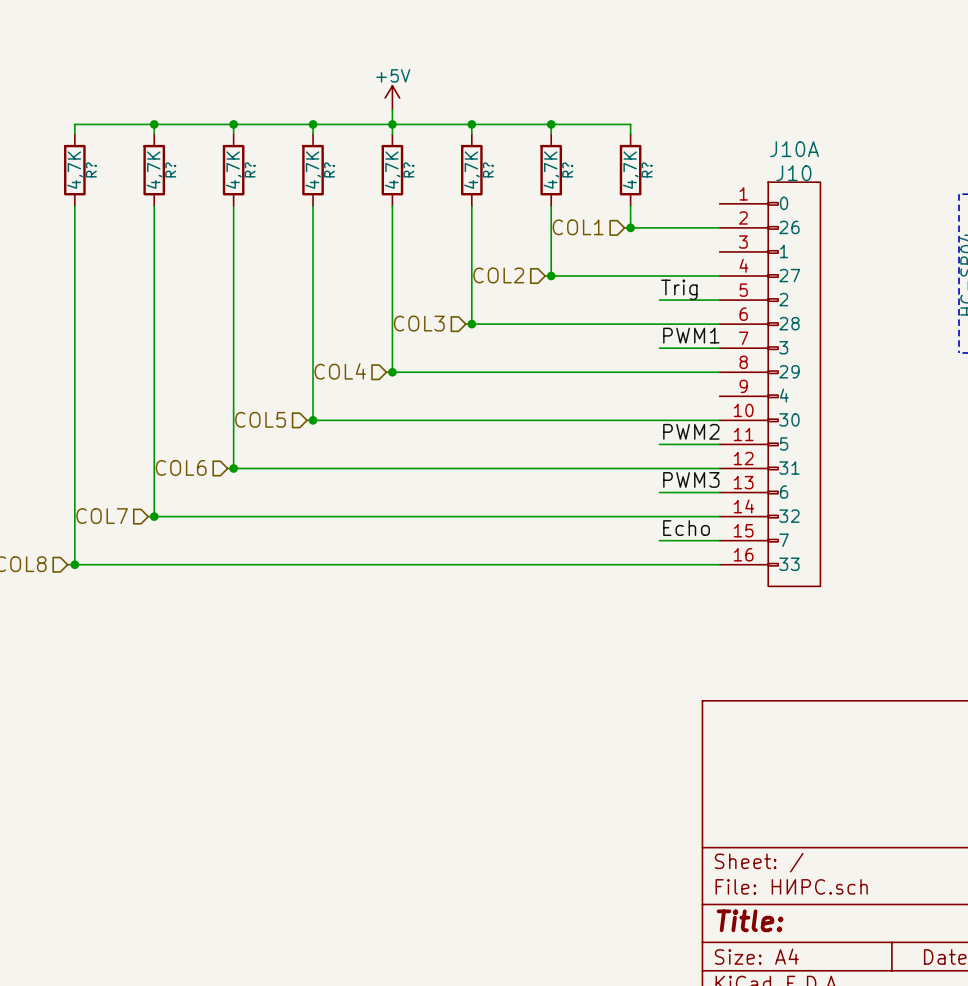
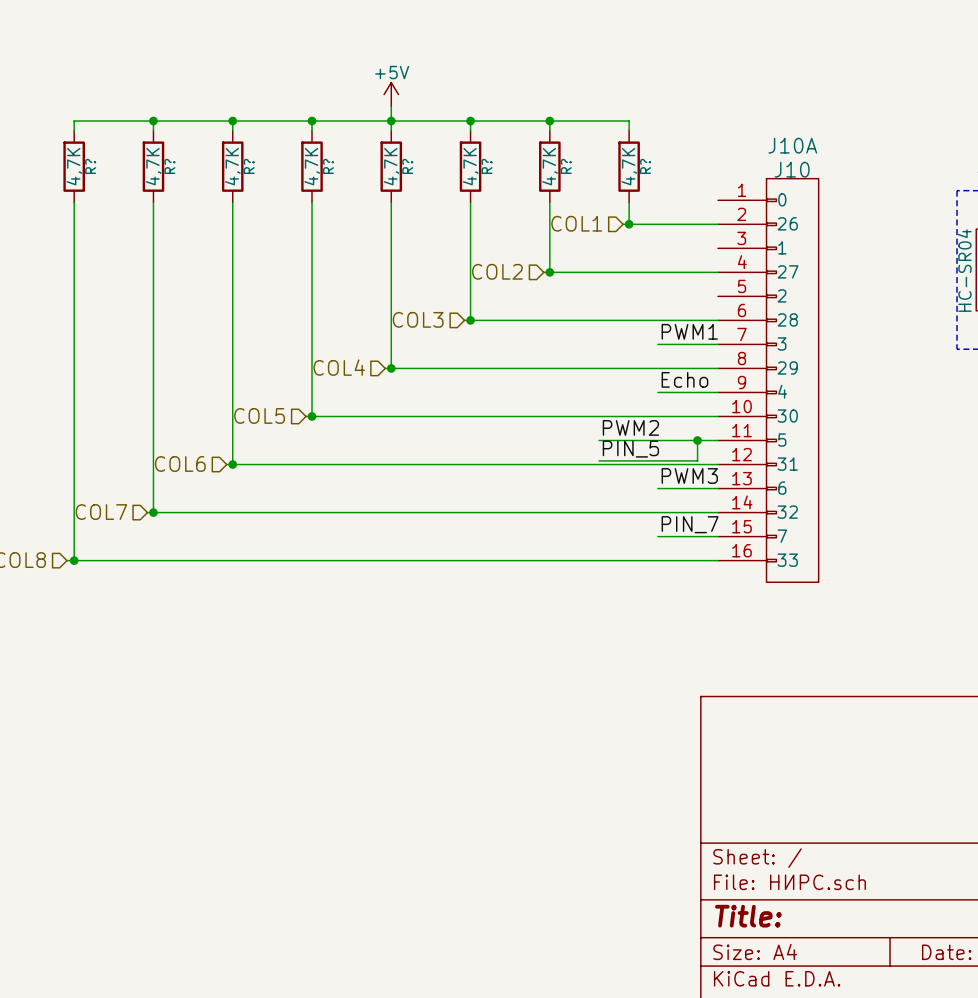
label: Trig (679, 289) -> none
wire: (659, 300) (719, 300) -> (657, 392) (717, 392)
label: none -> Echo (684, 379)
label position: PWM2 (691, 431) -> PWM2 (630, 427)
wire: none -> (599, 440) (657, 440)
wire: none -> (697, 440) (697, 460) (599, 460)
junction: none -> (697, 440)
label: none -> PIN_5 (630, 449)
label: Echo (686, 528) -> PIN_7 (690, 524)

